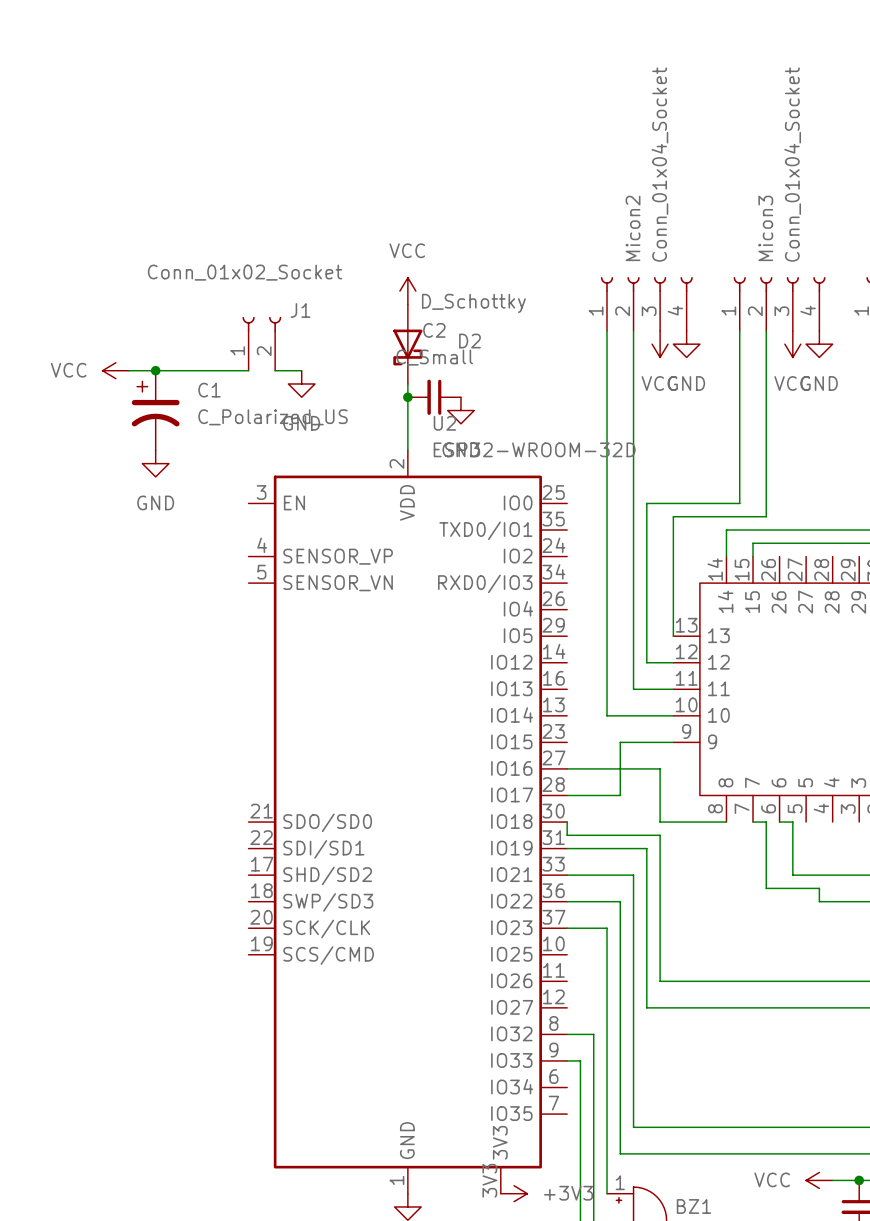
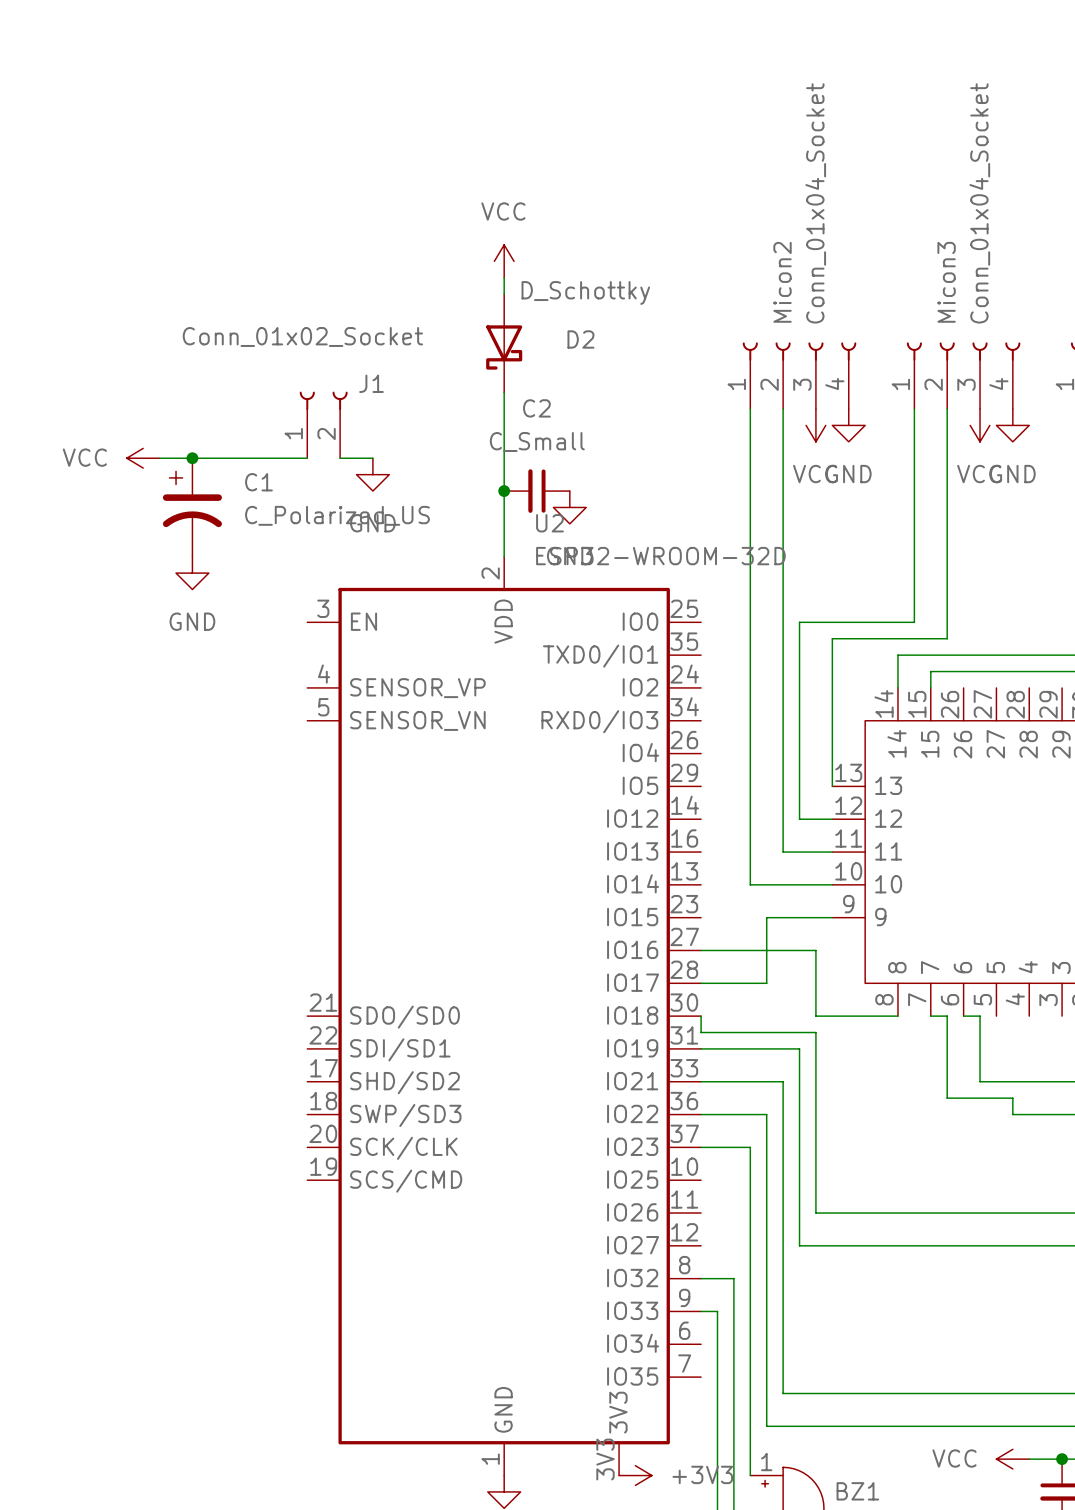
wire: none -> (504, 277) (504, 294)
power symbol position: VCC (407, 291) -> VCC (504, 261)
D2 position: (407, 344) -> (504, 343)

